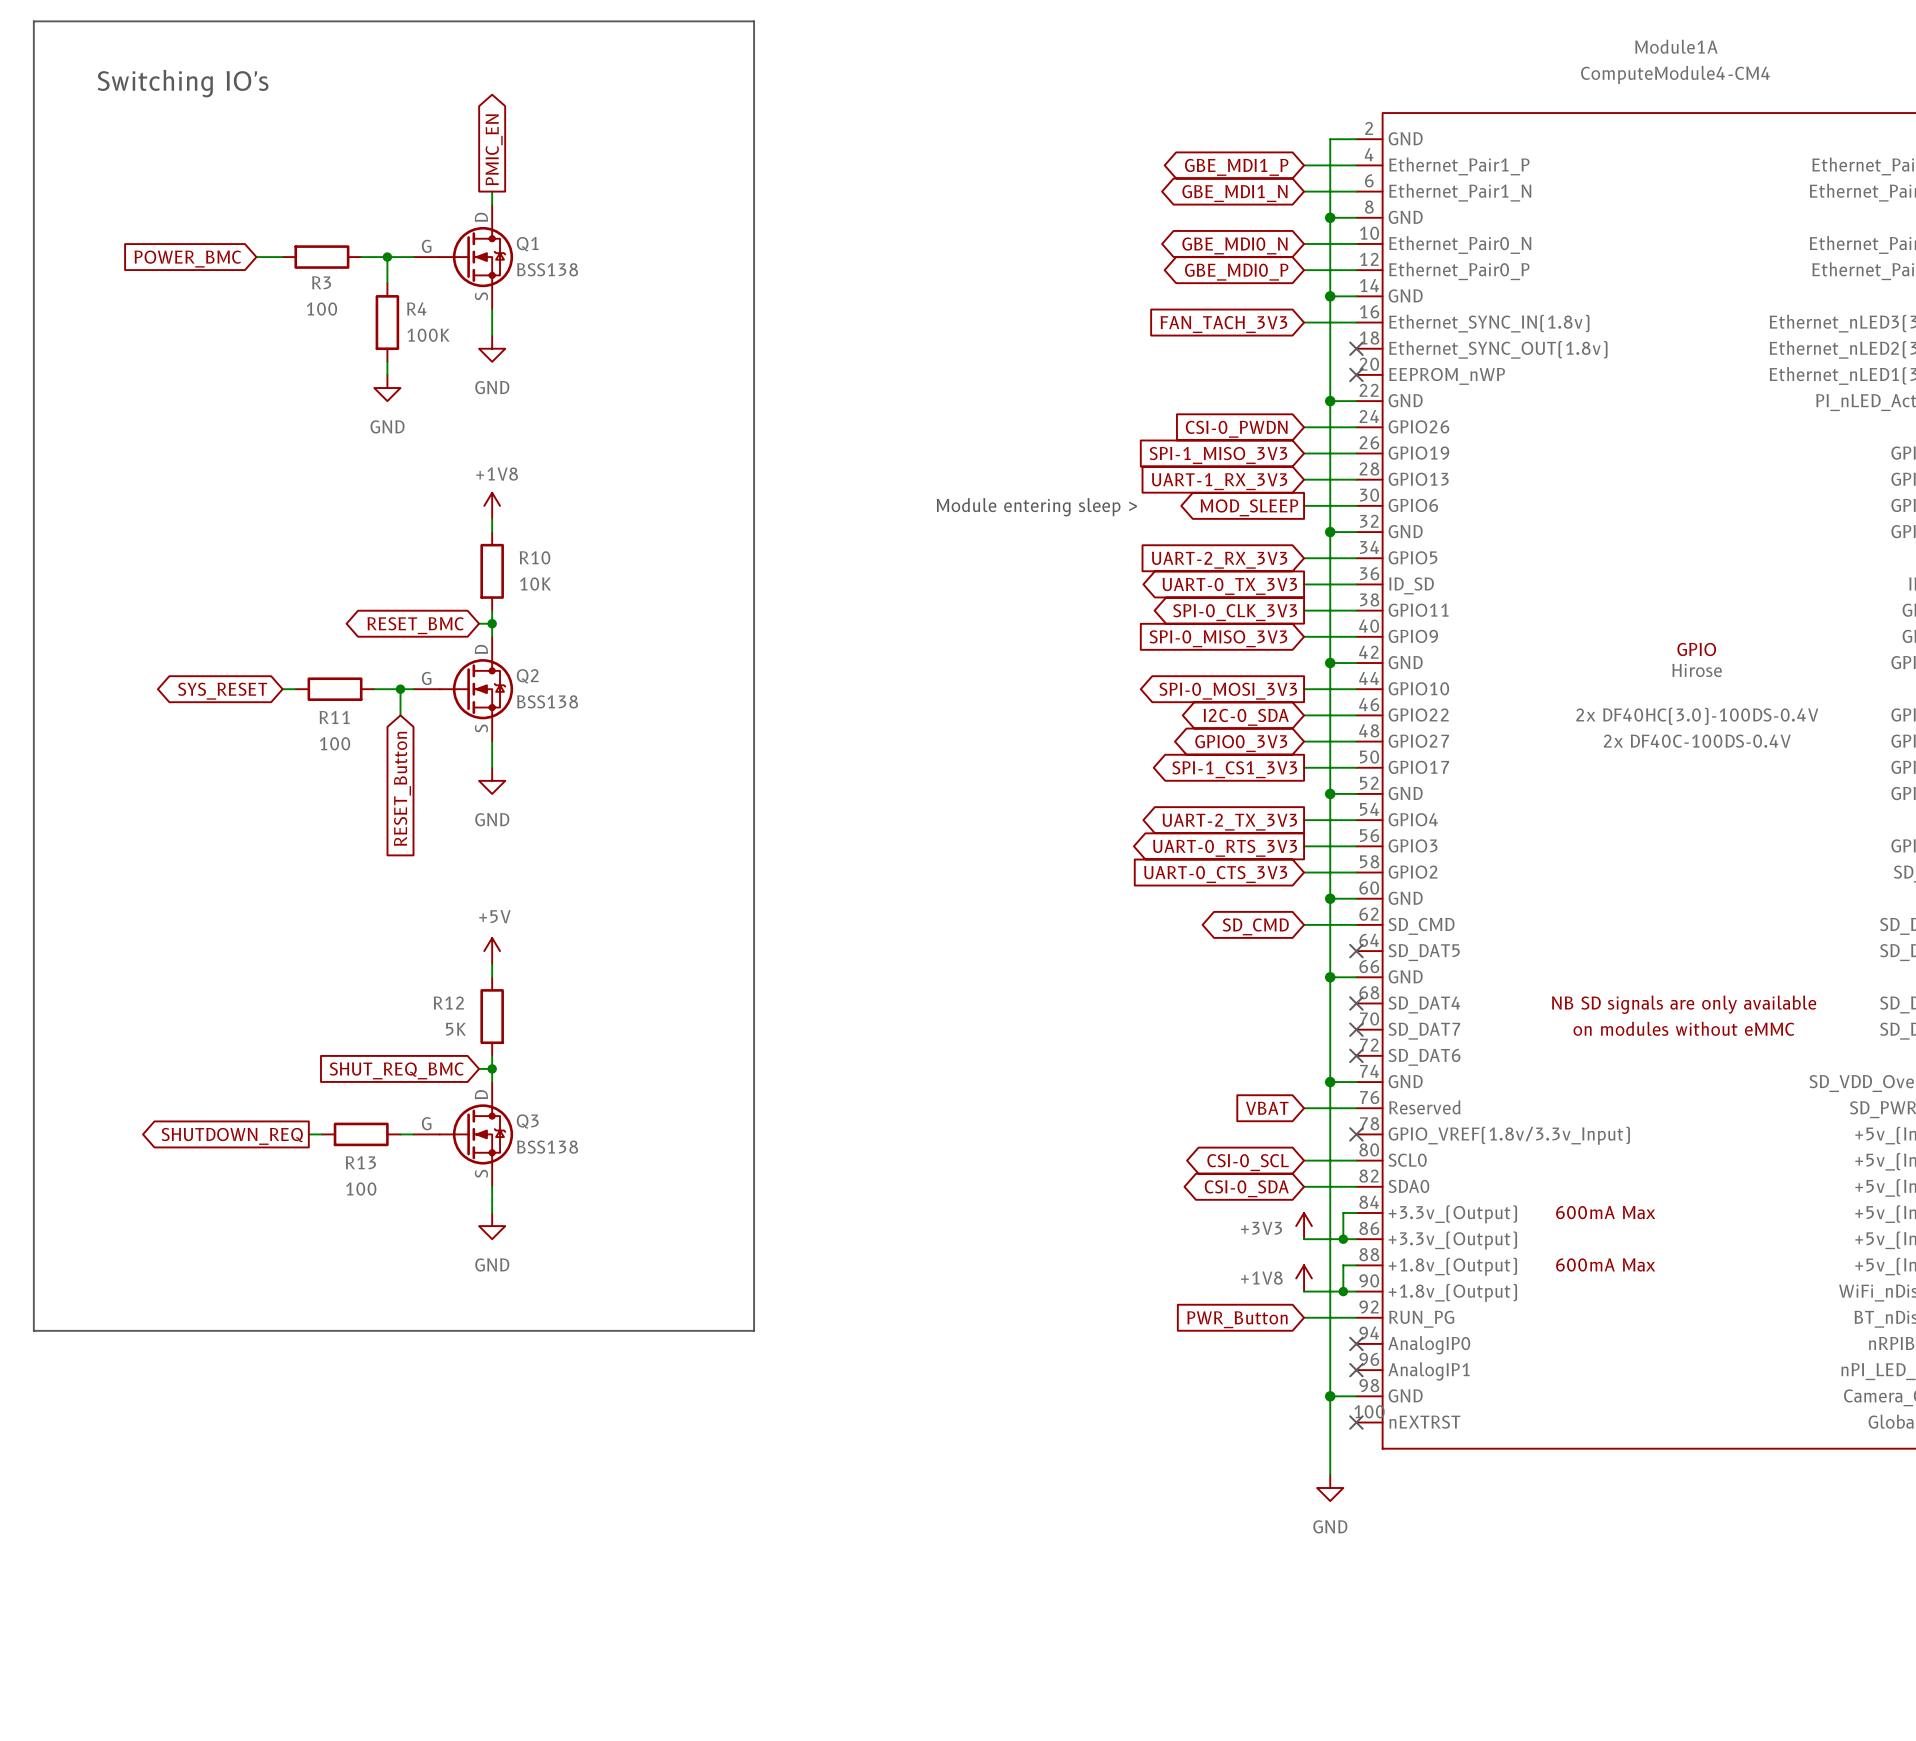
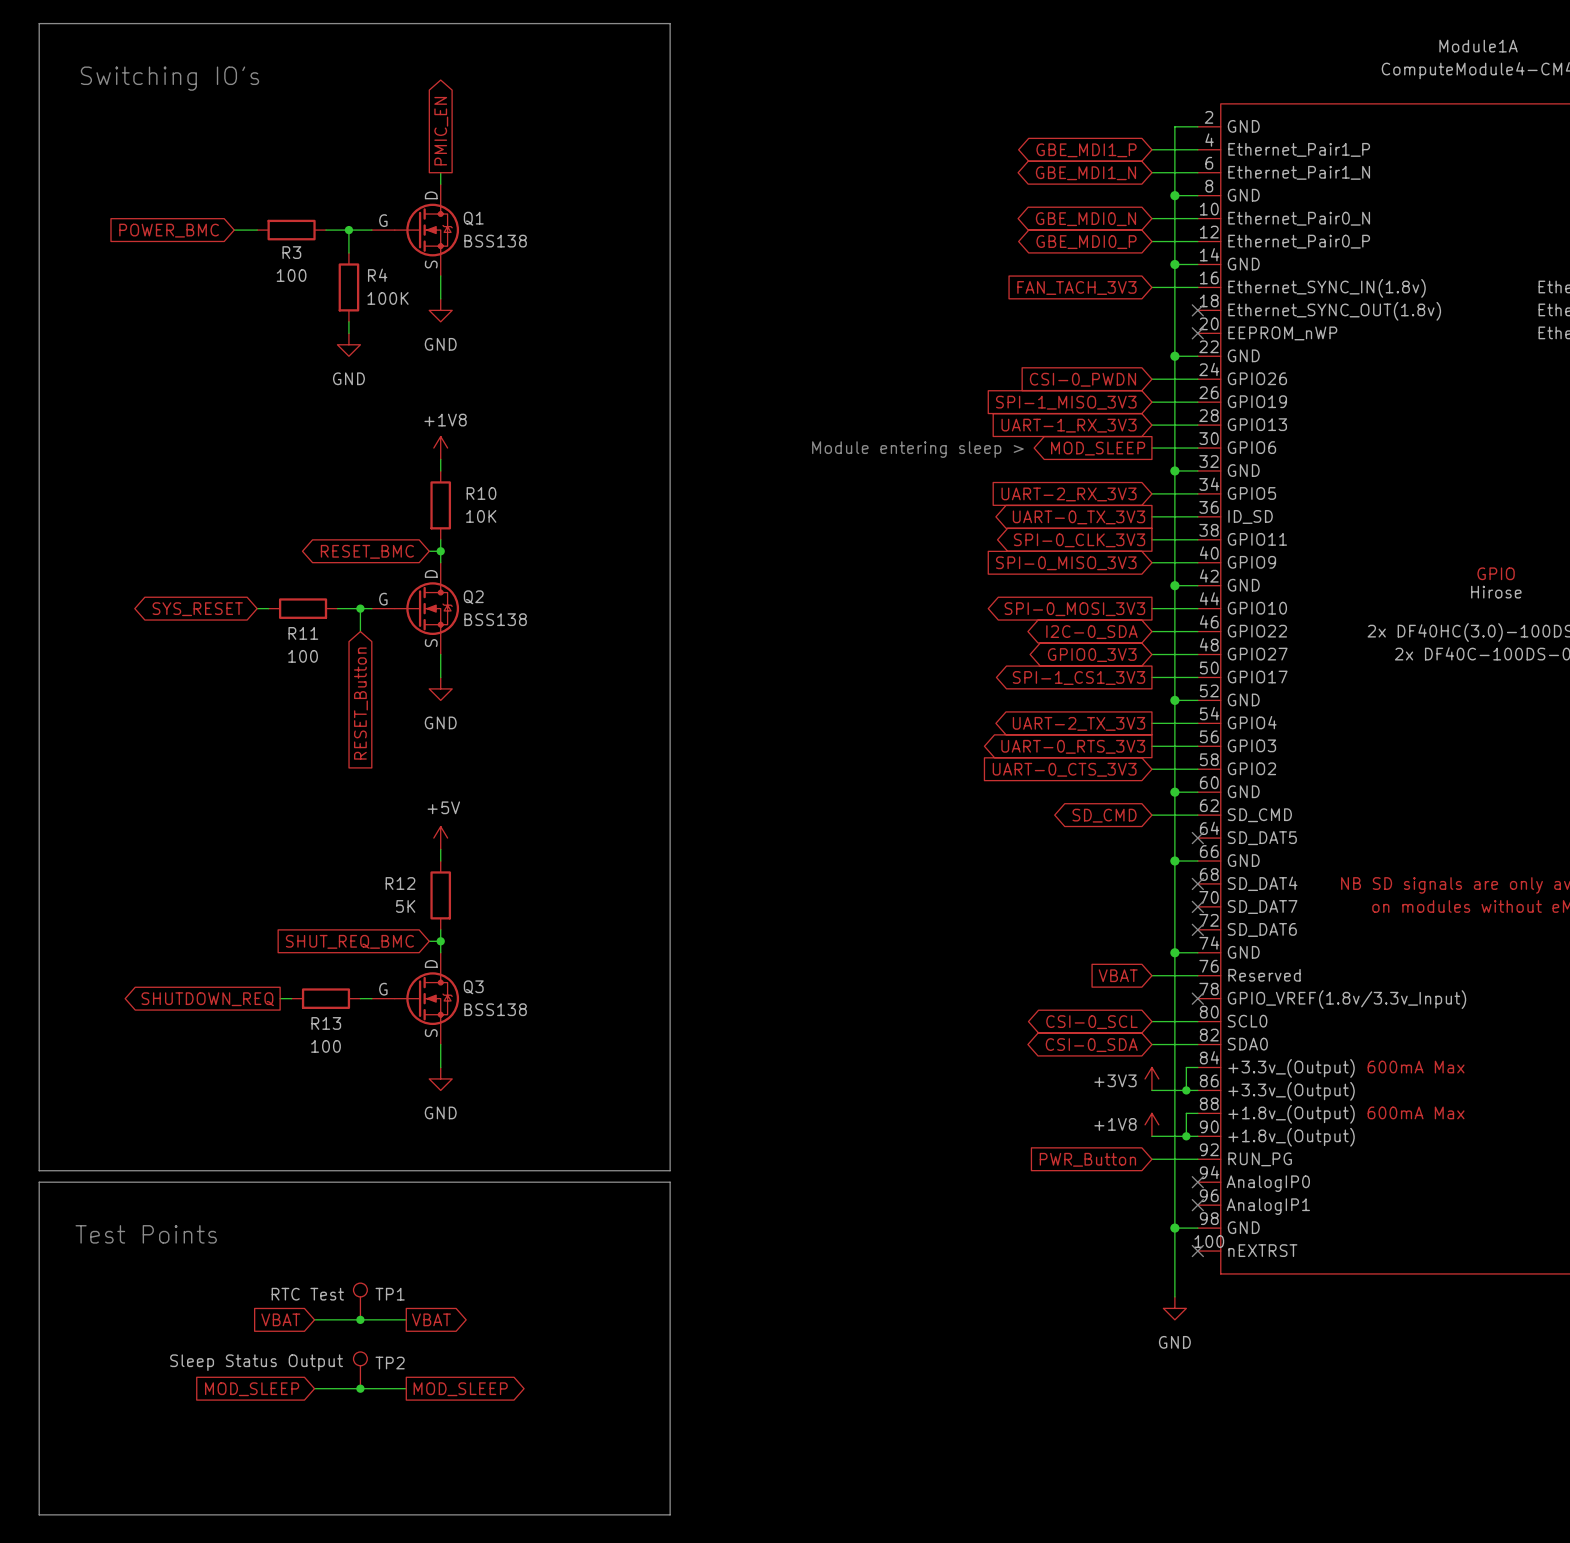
line: none -> (39, 1182) (670, 1182) (670, 1514) (39, 1514) (39, 1182)
text: none -> Test Points (146, 1234)
TP1: none -> RTC Test (360, 1301)
global label: none -> VBAT (280, 1319)
wire: none -> (314, 1319) (406, 1319)
junction: none -> (360, 1319)
global label: none -> VBAT (431, 1319)
TP2: none -> Sleep Status Output (360, 1370)
wire: none -> (314, 1388) (406, 1388)
junction: none -> (360, 1388)
global label: none -> MOD_SLEEP (252, 1389)
global label: none -> MOD_SLEEP (460, 1389)

